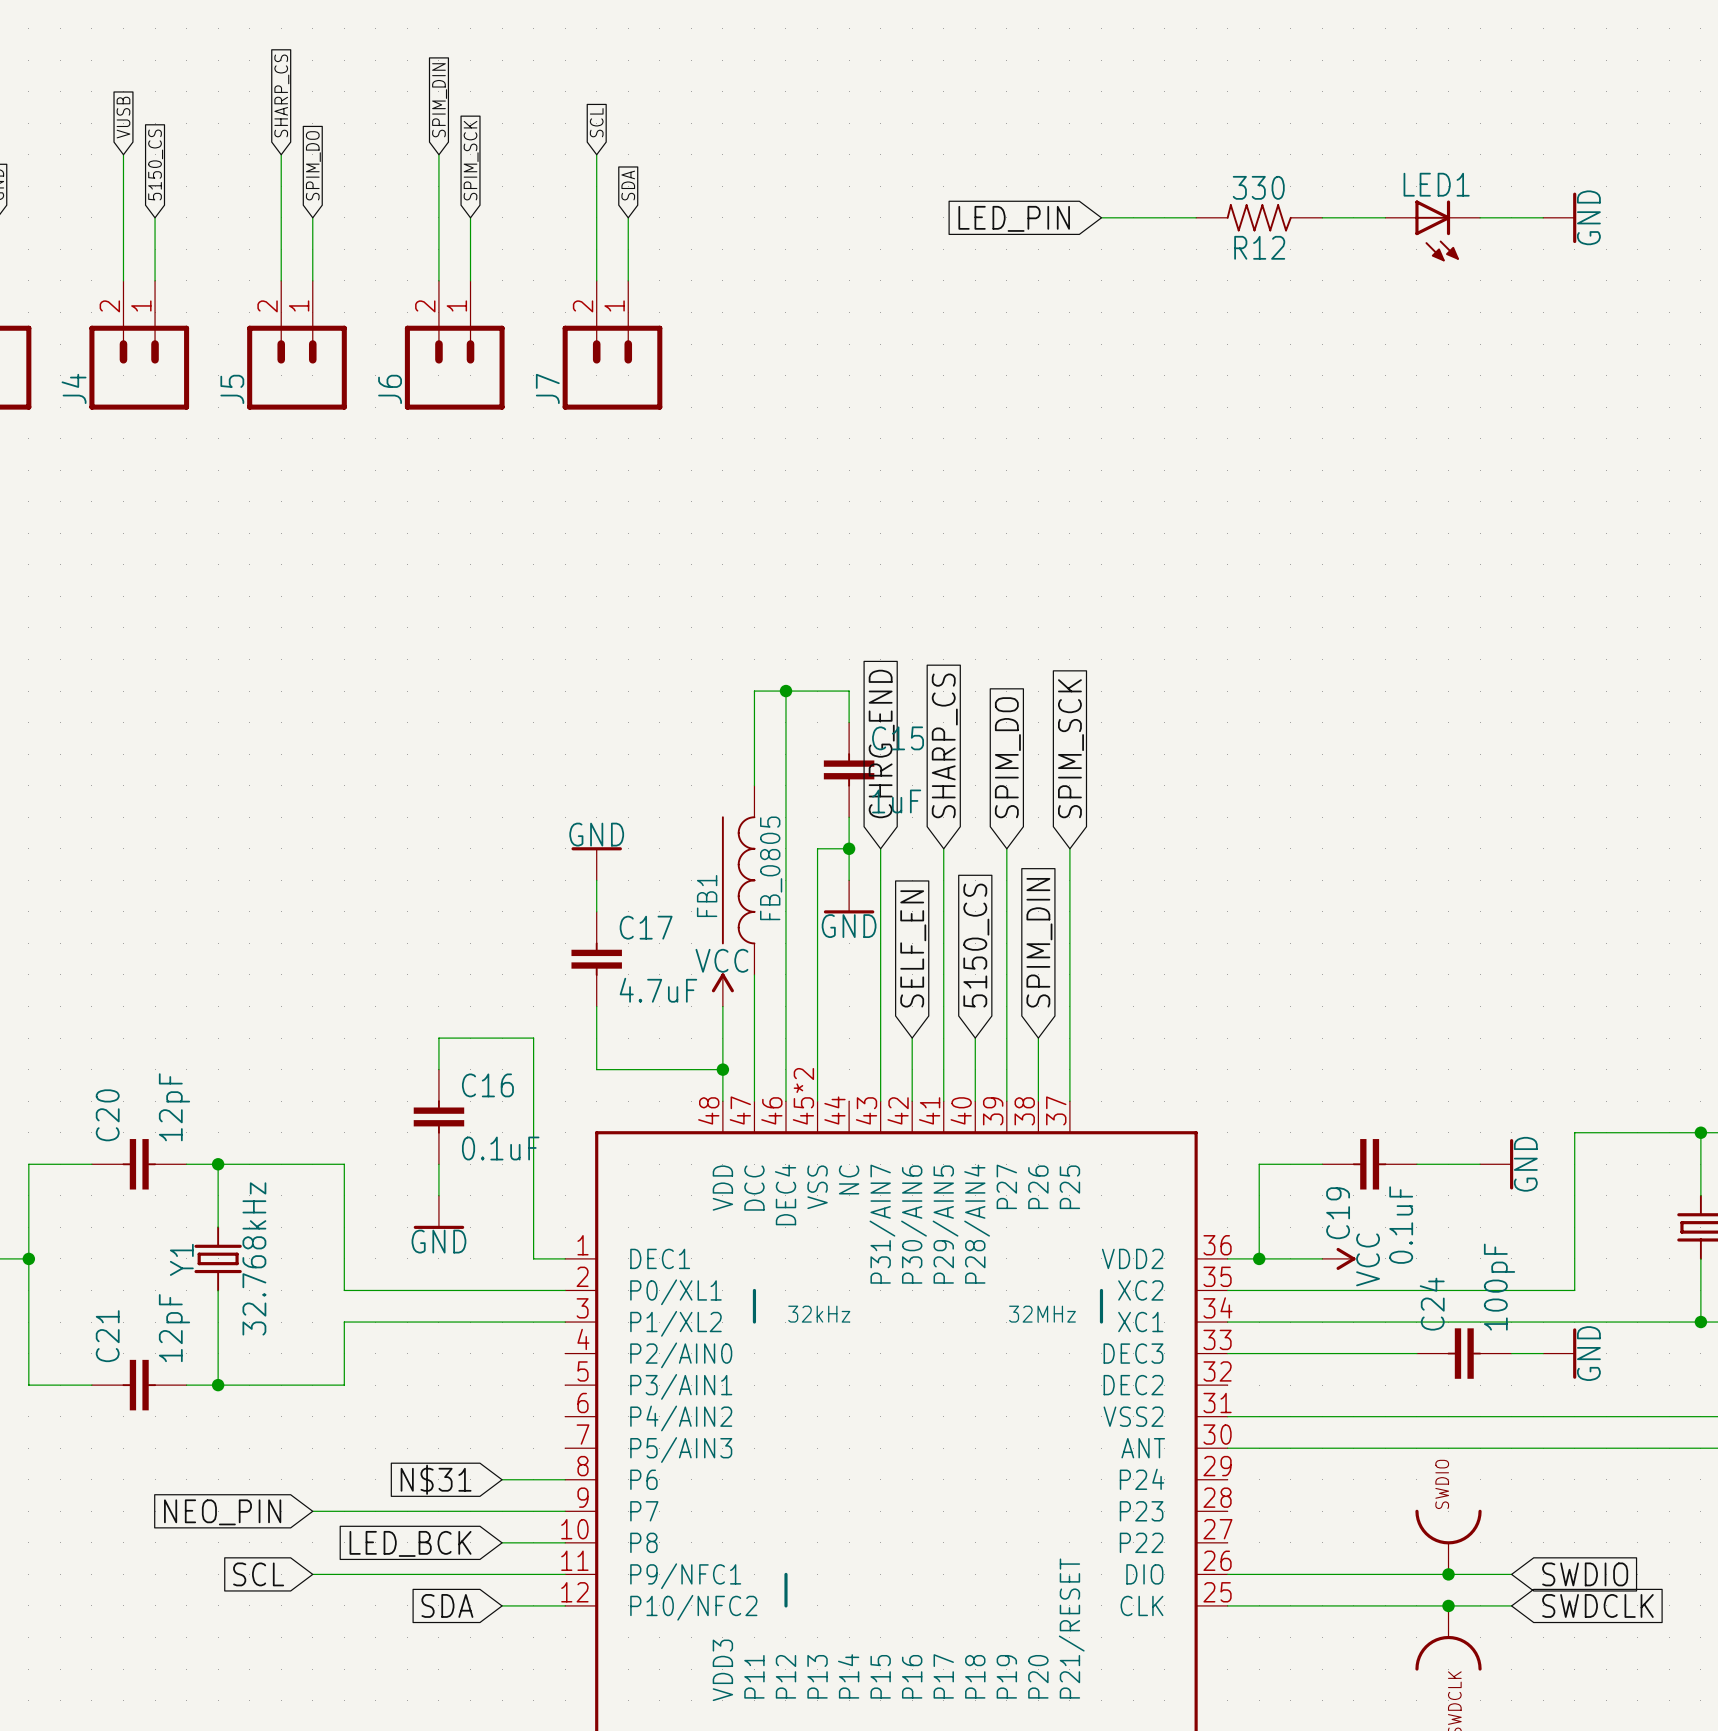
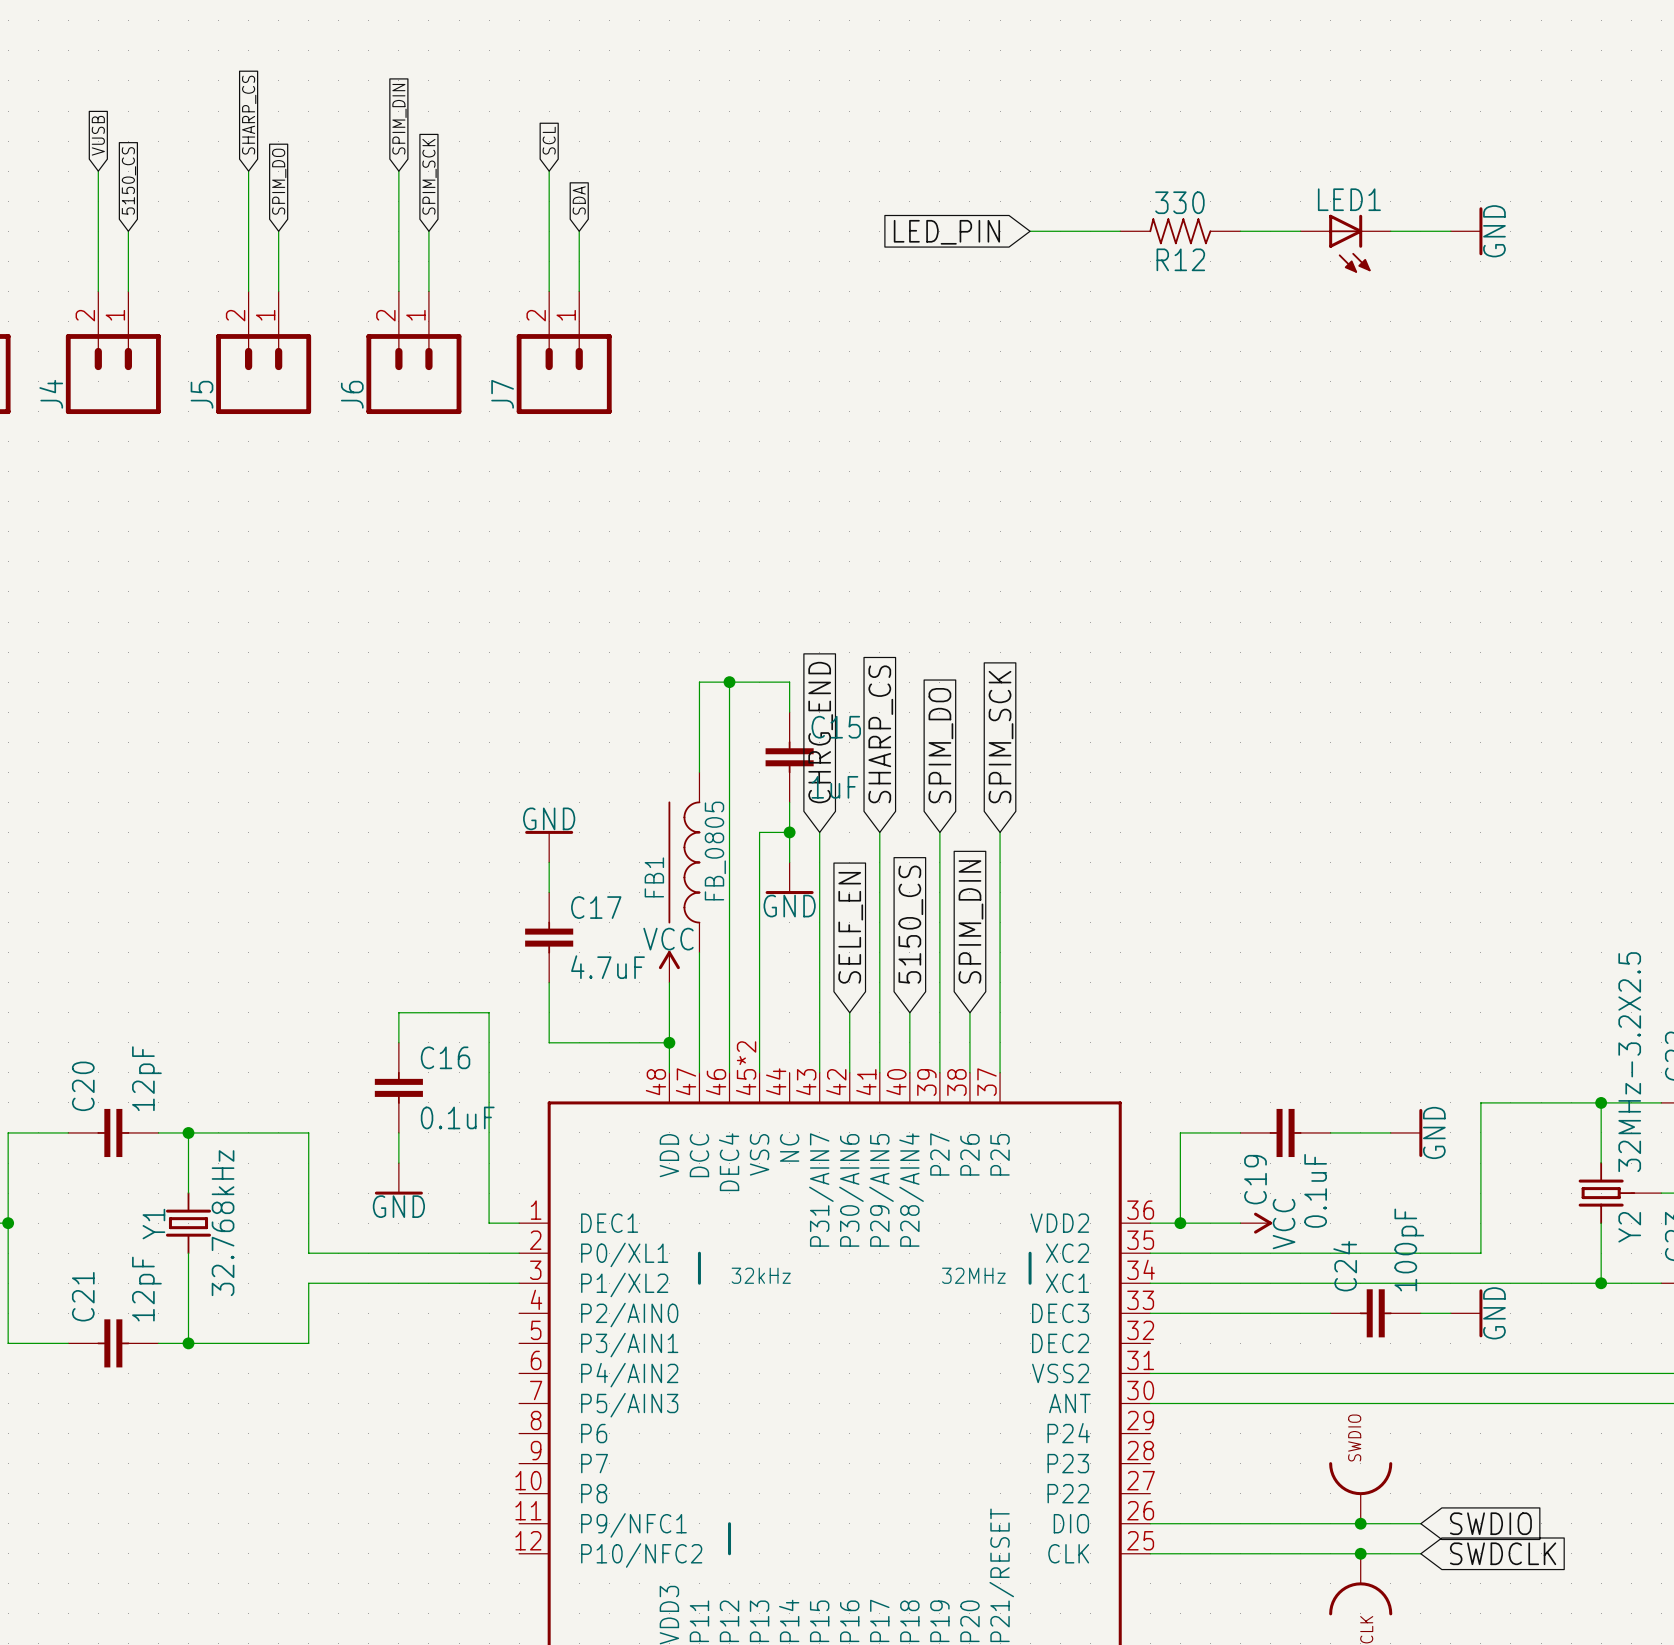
global label: N$31 (436, 1479) -> none
wire: (502, 1479) (565, 1479) -> none
wire: (312, 1511) (565, 1511) -> none
global label: NEO_PIN (222, 1512) -> none
wire: (502, 1542) (565, 1542) -> none
global label: LED_BCK (410, 1543) -> none
global label: SCL (258, 1574) -> none
wire: (312, 1574) (565, 1574) -> none
global label: SDA (447, 1605) -> none
wire: (502, 1605) (565, 1605) -> none

